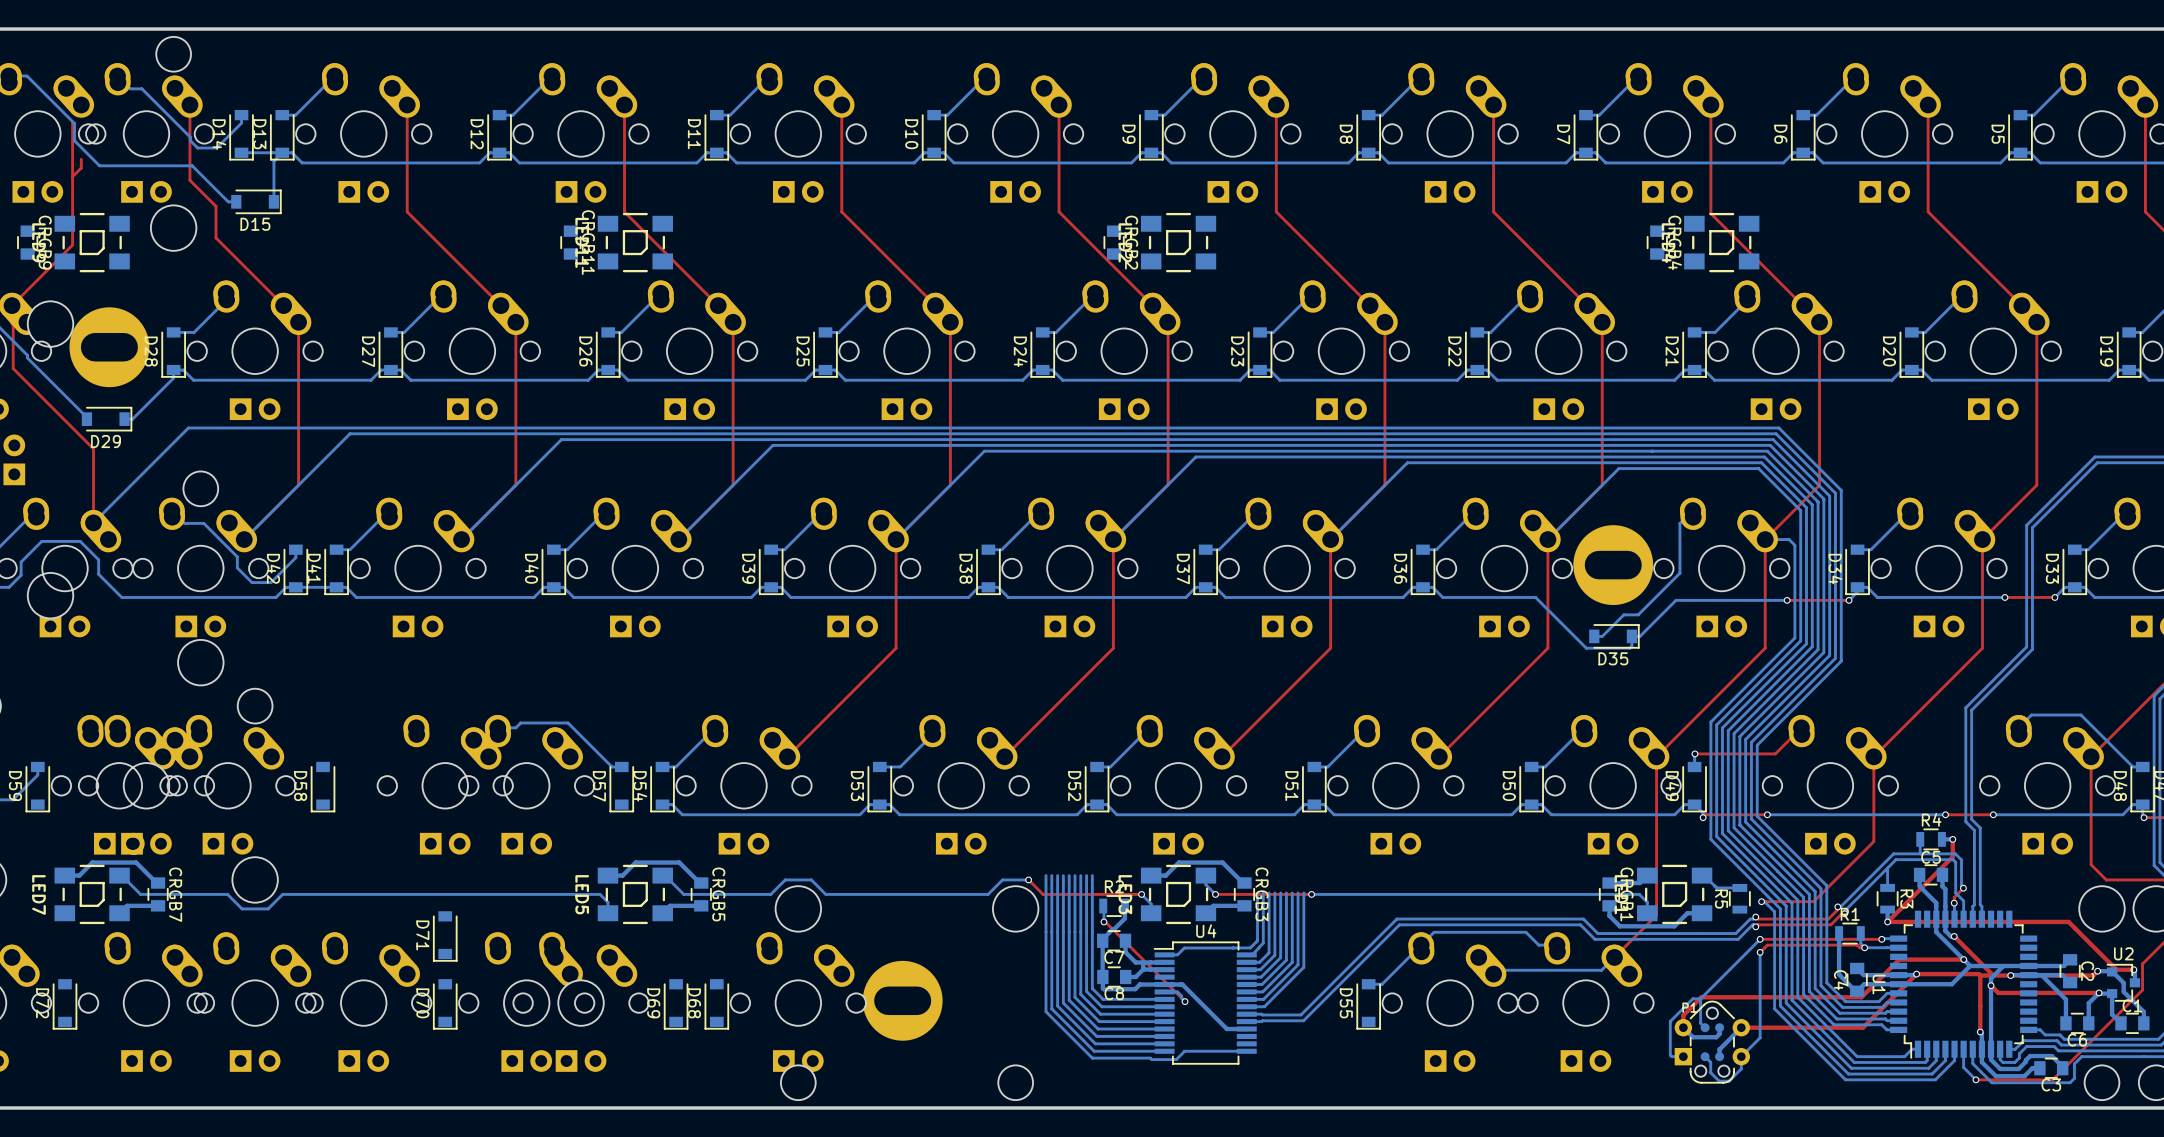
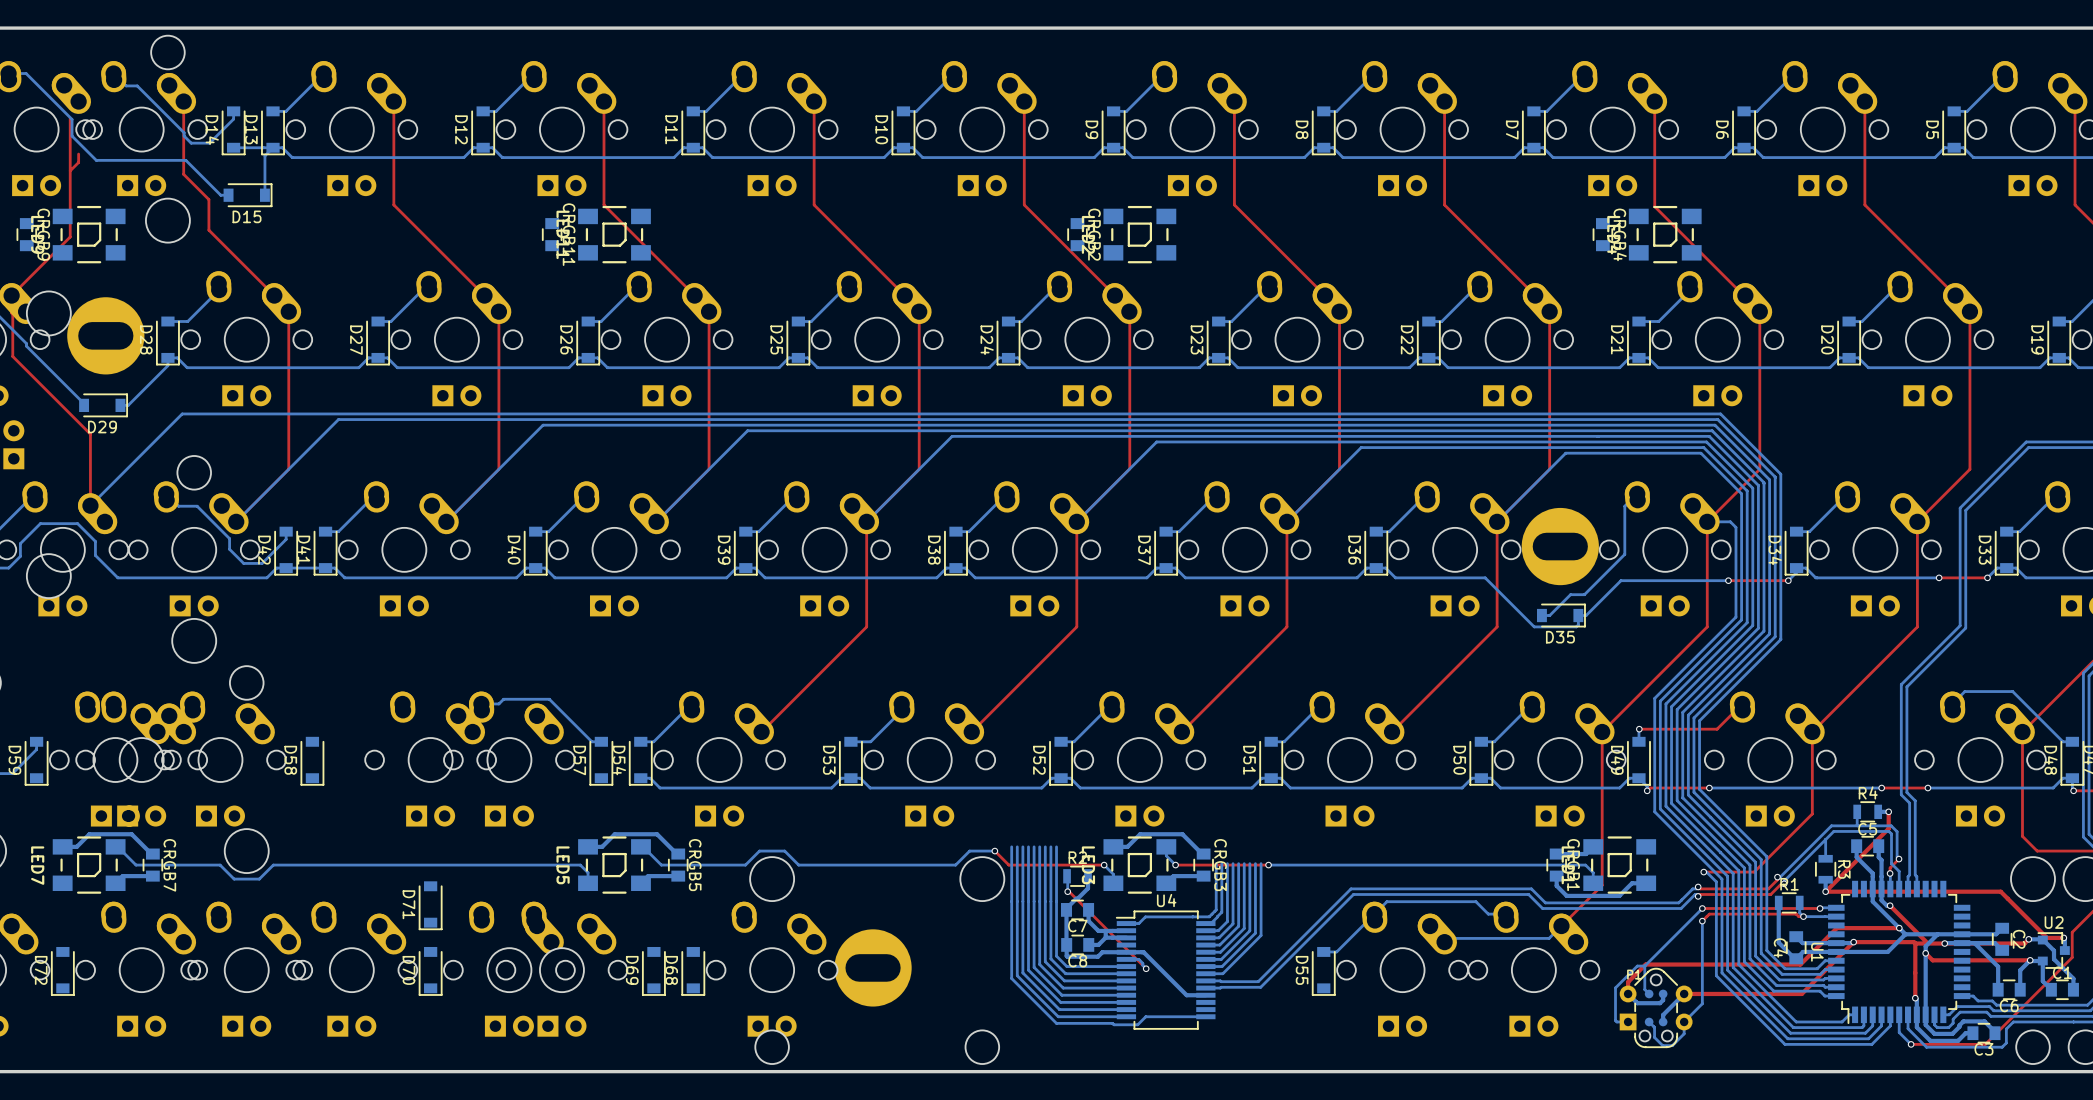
bottom track: (1702, 875) (1716, 887) (1739, 887) -> none
R5: (1739, 898) -> none

